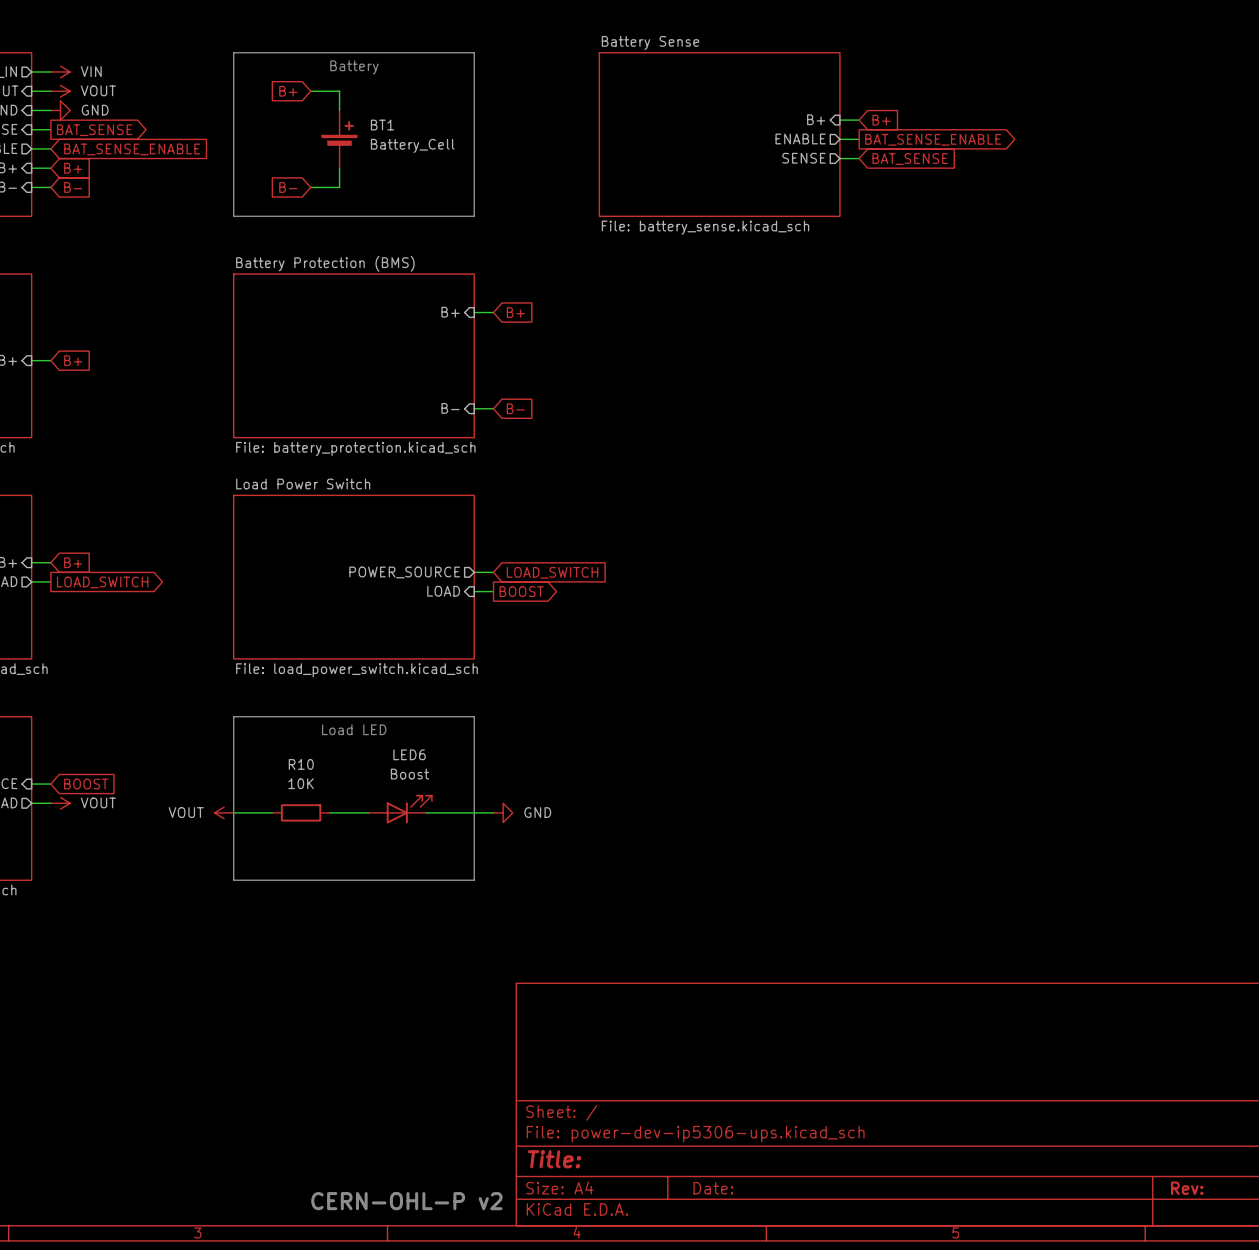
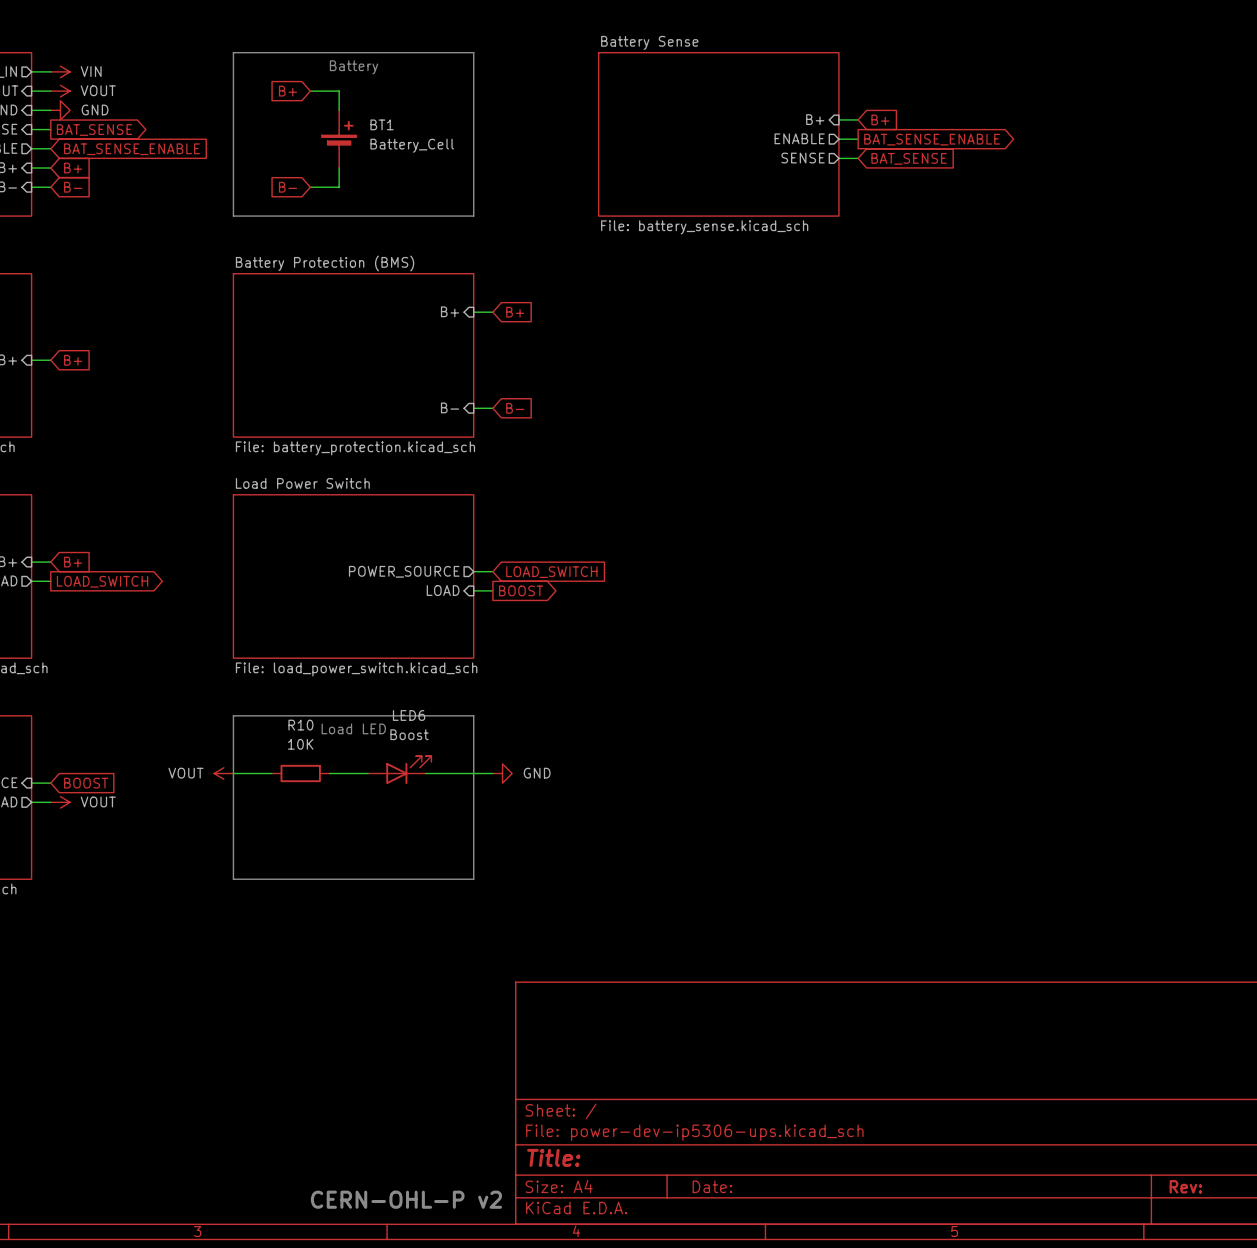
LED6 position: (400, 809) -> (399, 770)
power symbol position: VOUT (224, 812) -> VOUT (223, 773)
wire: (233, 812) (272, 812) -> (233, 773) (271, 773)
R10 position: (301, 812) -> (300, 773)
wire: (329, 812) (368, 812) -> (329, 773) (367, 773)
wire: (426, 812) (493, 812) -> (425, 773) (492, 773)
power symbol position: GND (503, 812) -> GND (502, 773)

